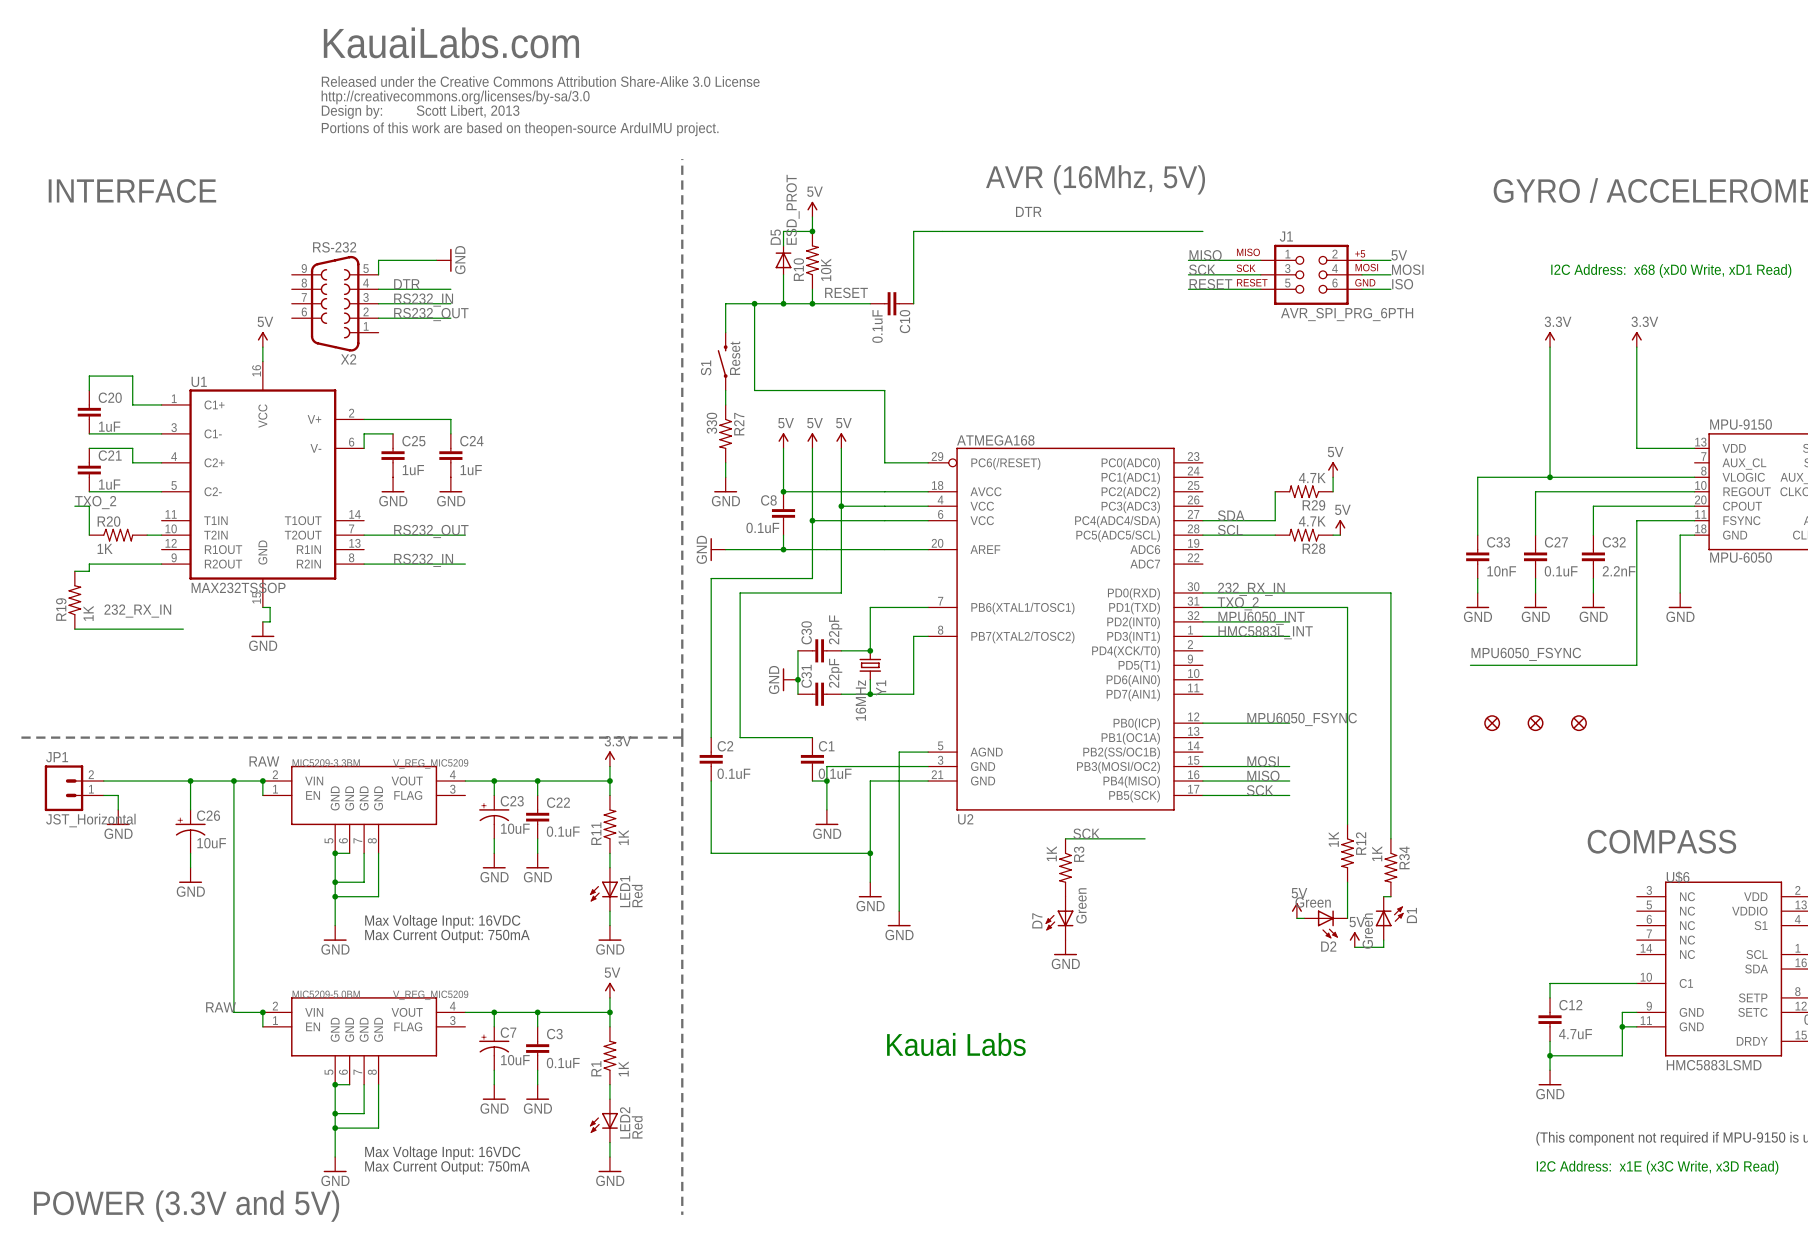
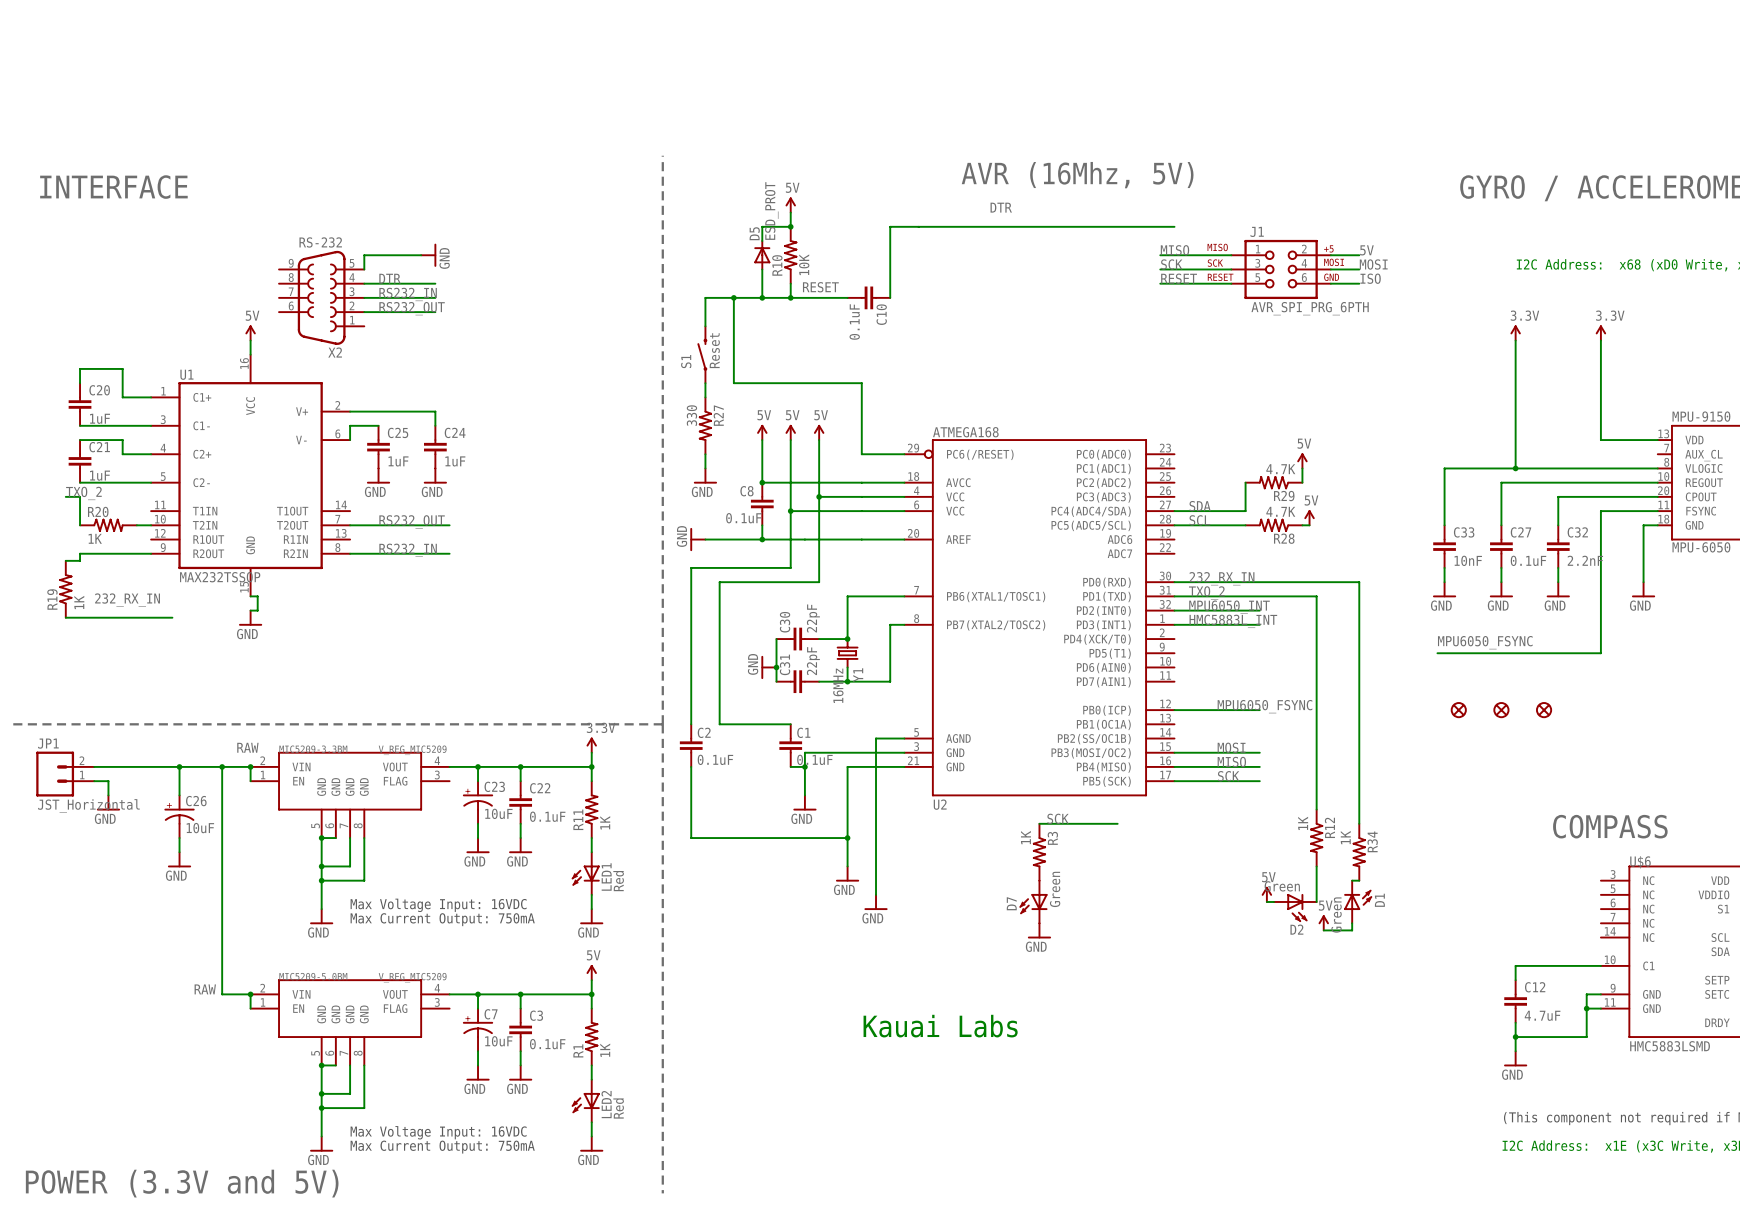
text: KauaiLabs.com (451, 42) -> none
part: (540, 97) -> none
text: Scott Libert, 2013 (468, 111) -> none
text: Portions of this work are based on theopen-source ArduIMU project. (520, 129) -> none

